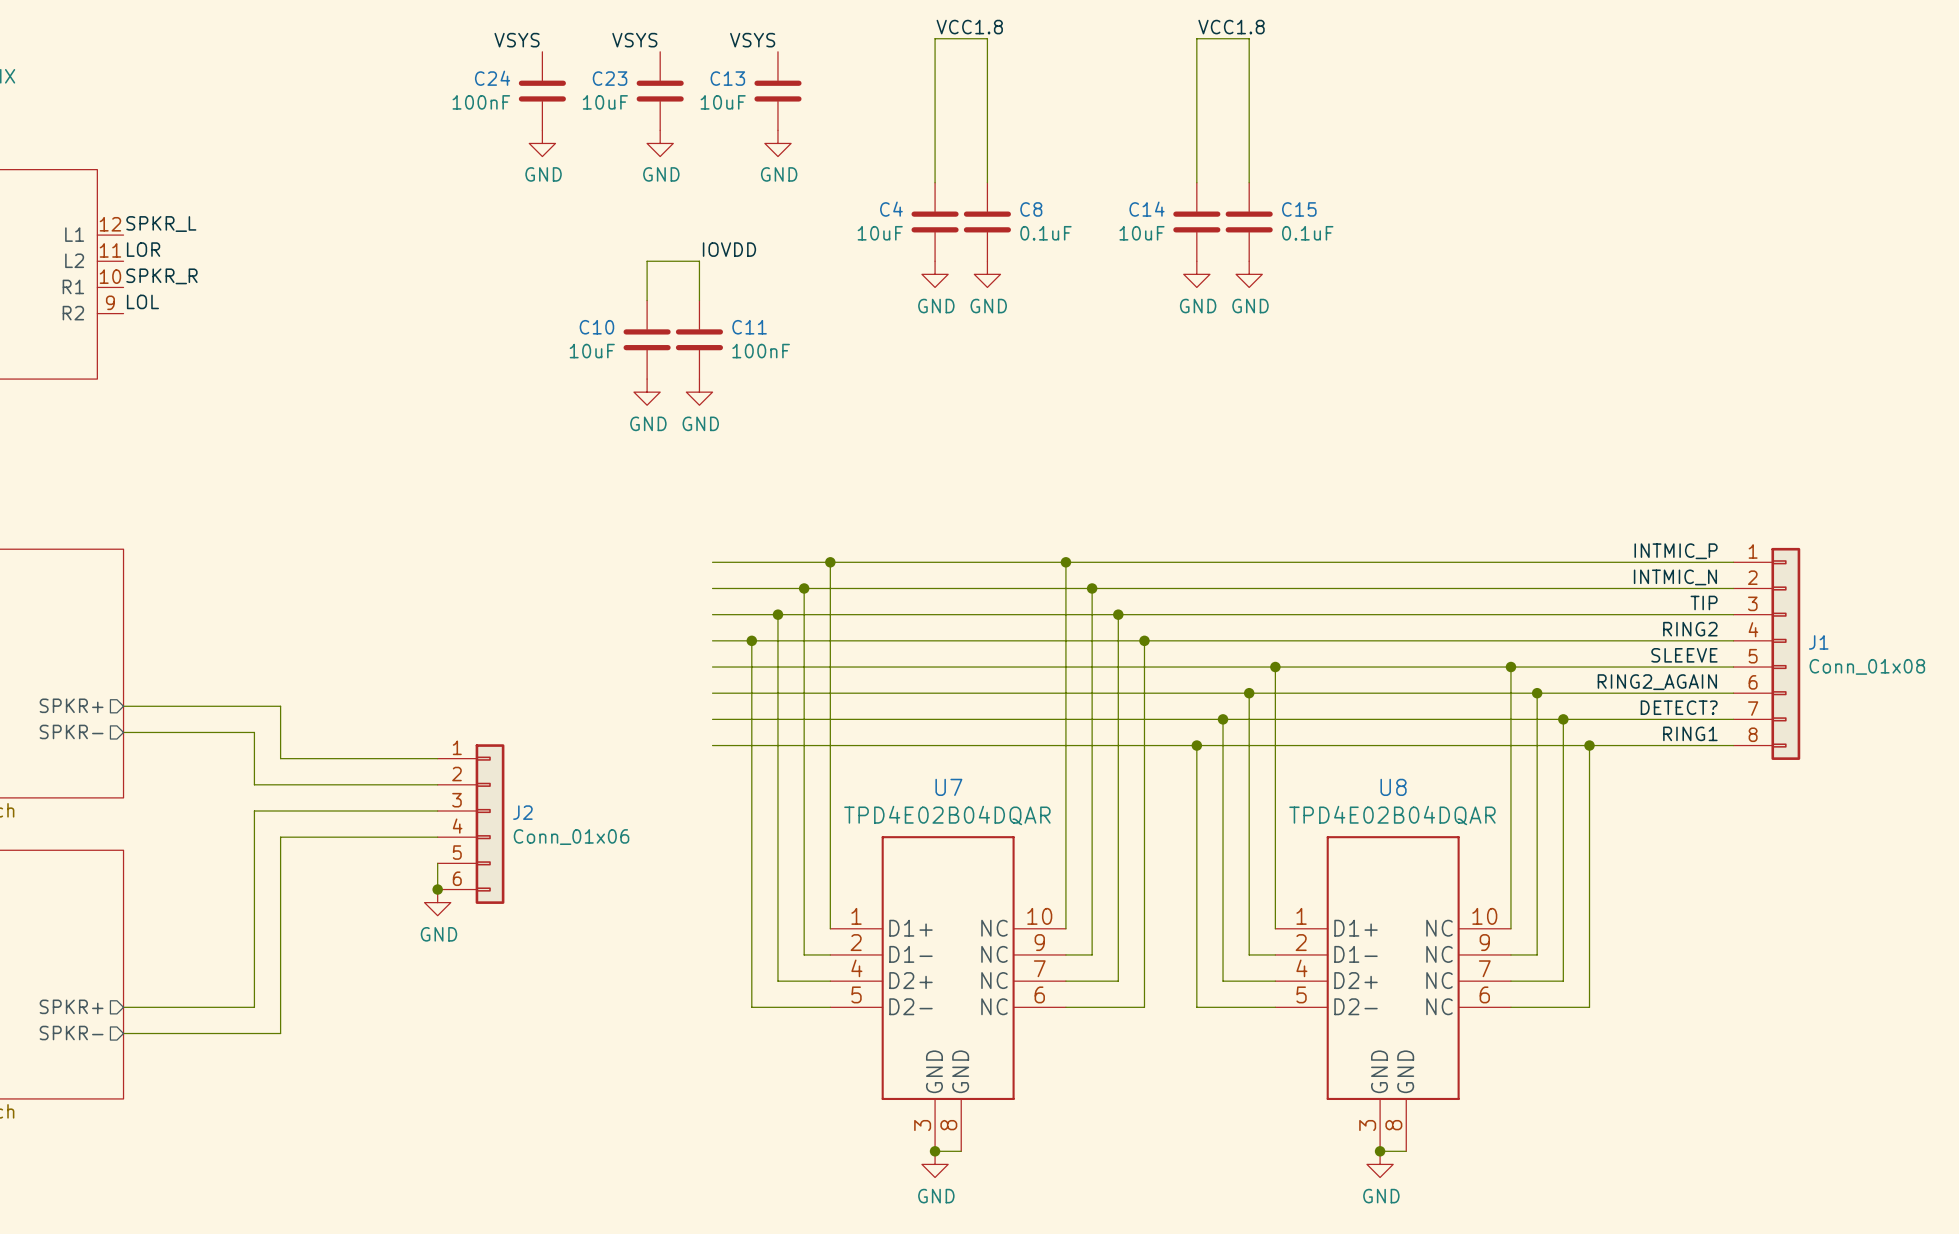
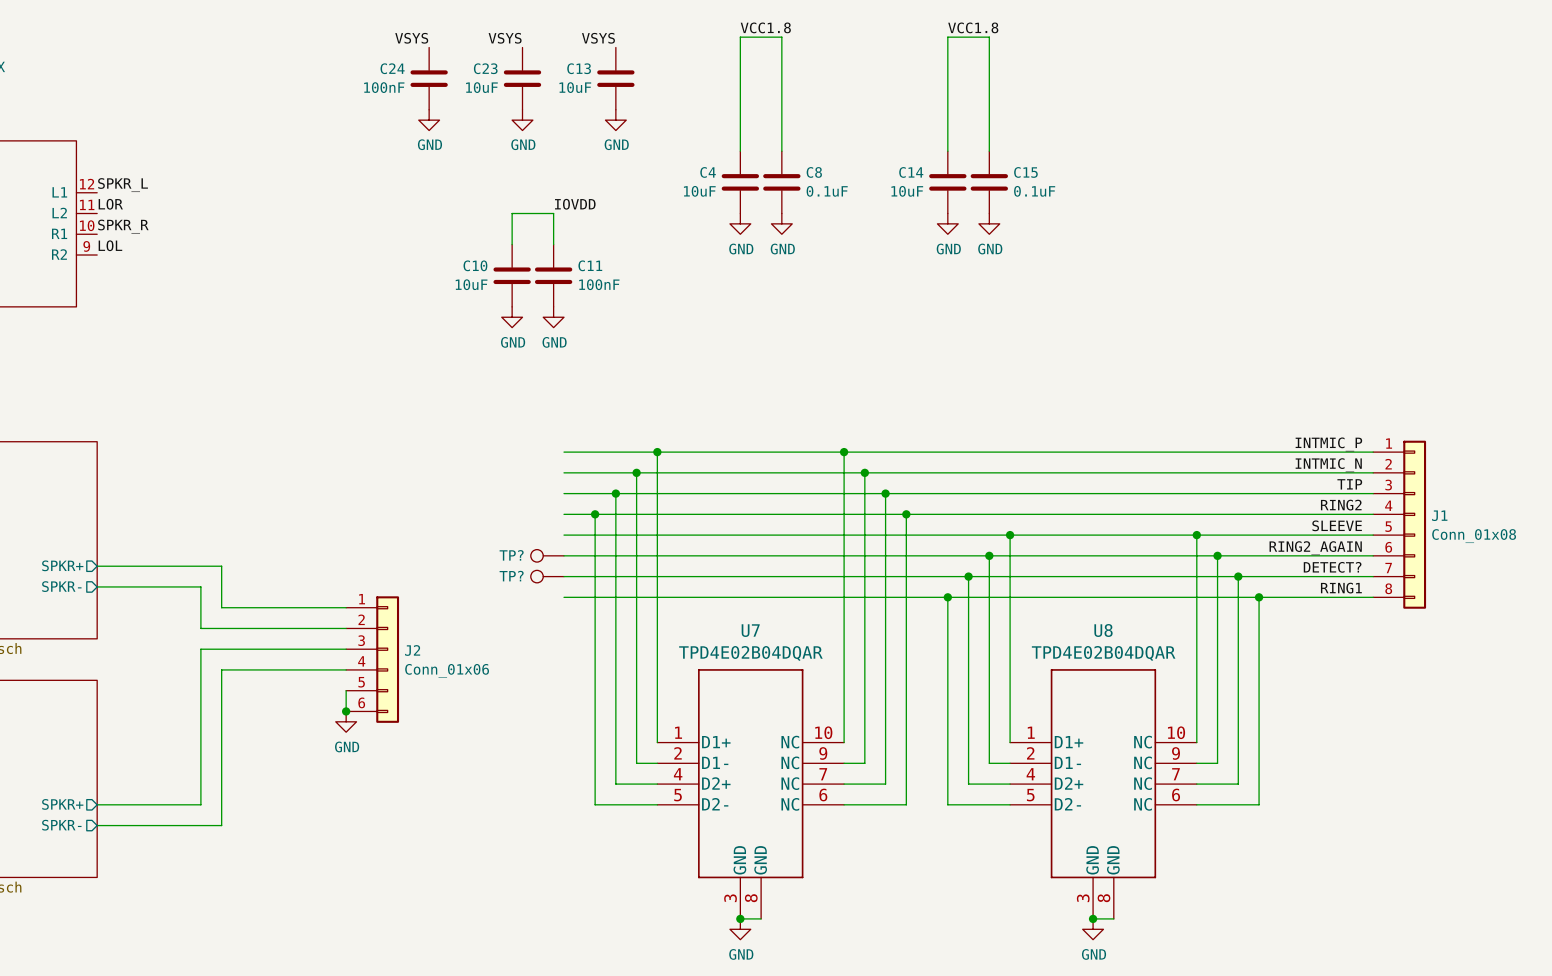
TP?: none -> (547, 555)
TP?: none -> (547, 576)

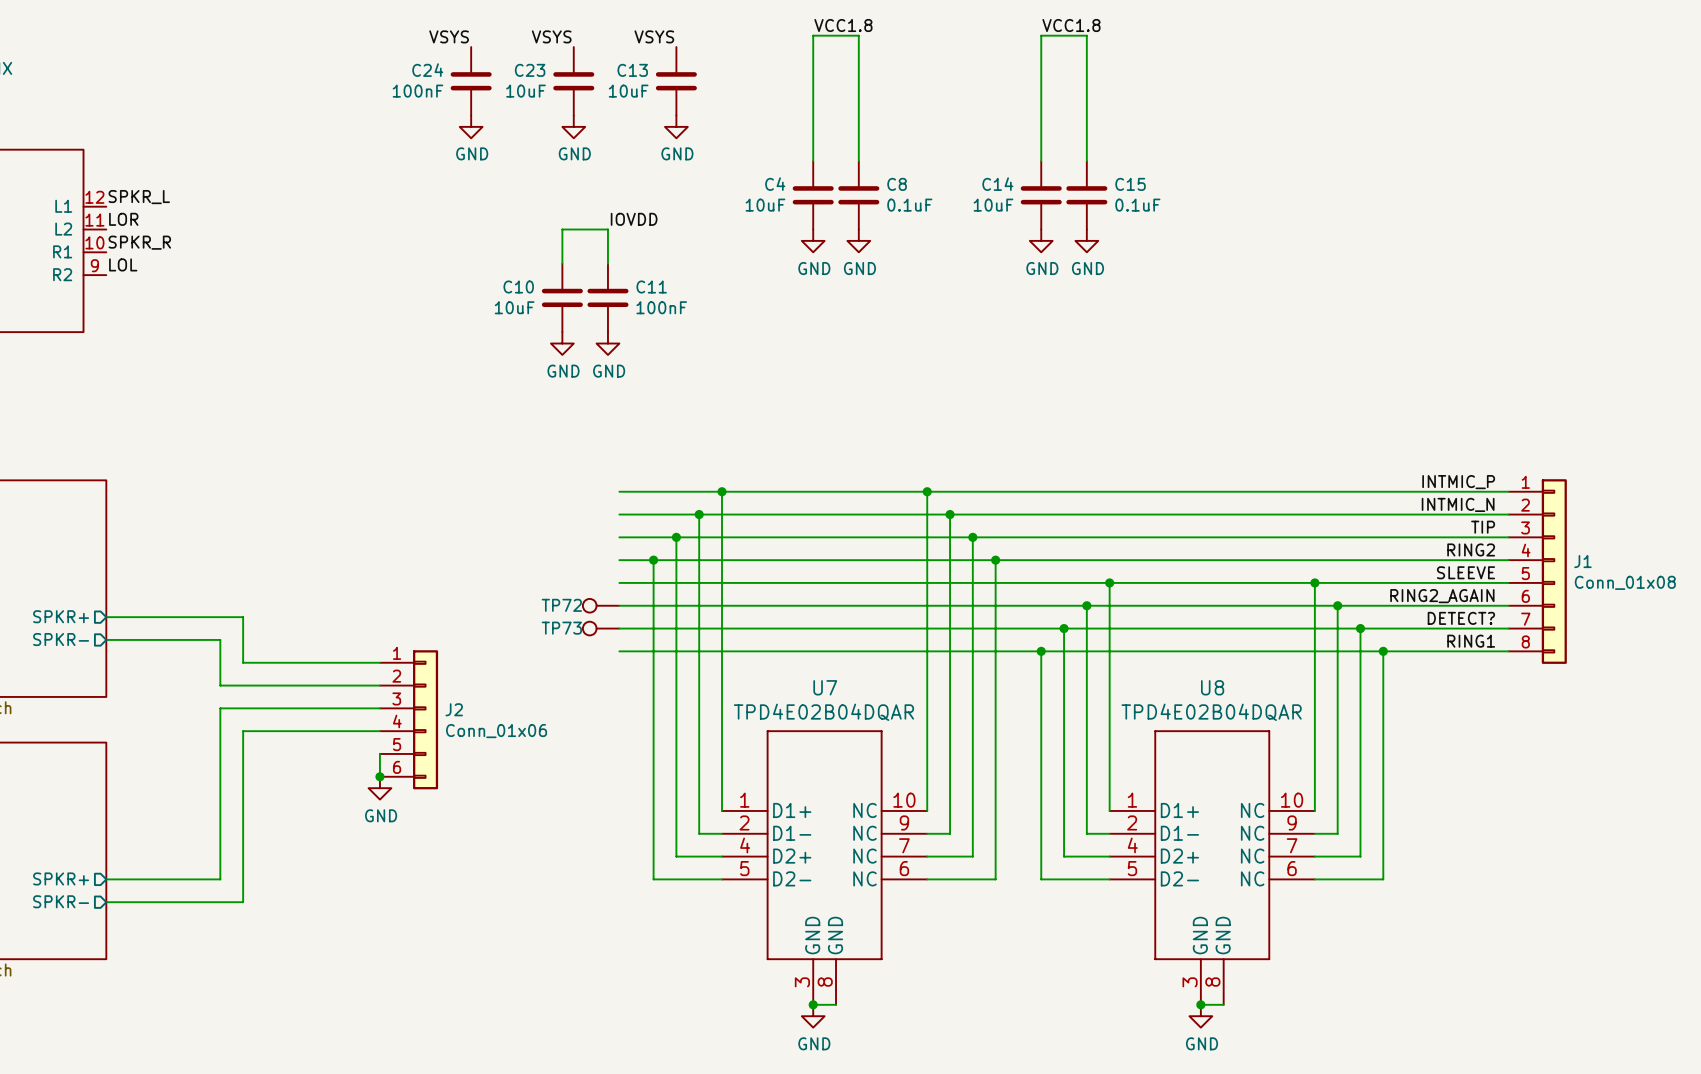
TP? name: TP? (511, 555) -> TP72 (561, 605)
TP? name: TP? (511, 576) -> TP73 (561, 628)

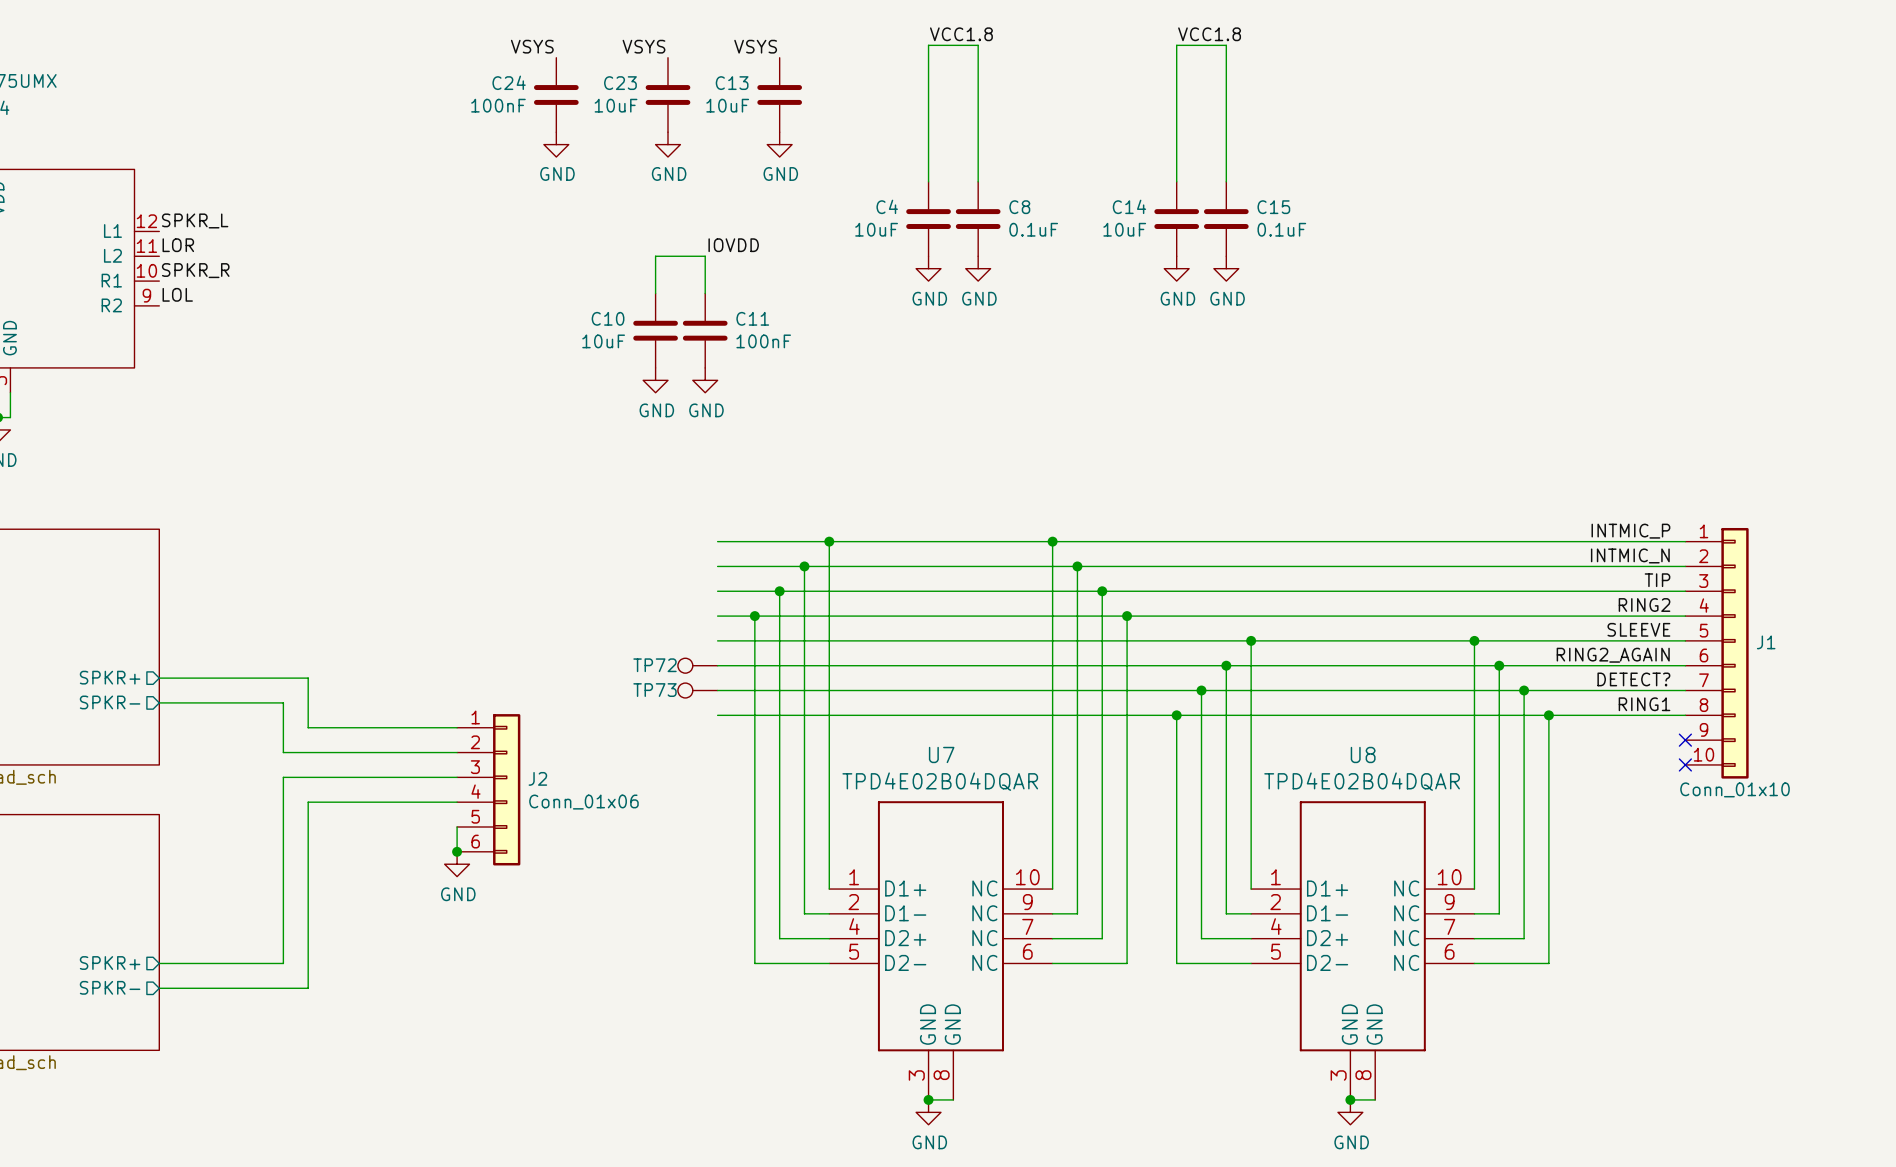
J1 symbol: [1508, 479, 1567, 664] -> [1685, 527, 1749, 779]
J1 value: Conn_01x08 (1625, 582) -> Conn_01x10 (1735, 789)
no-connect mark: none -> (1685, 740)
no-connect mark: none -> (1685, 764)

